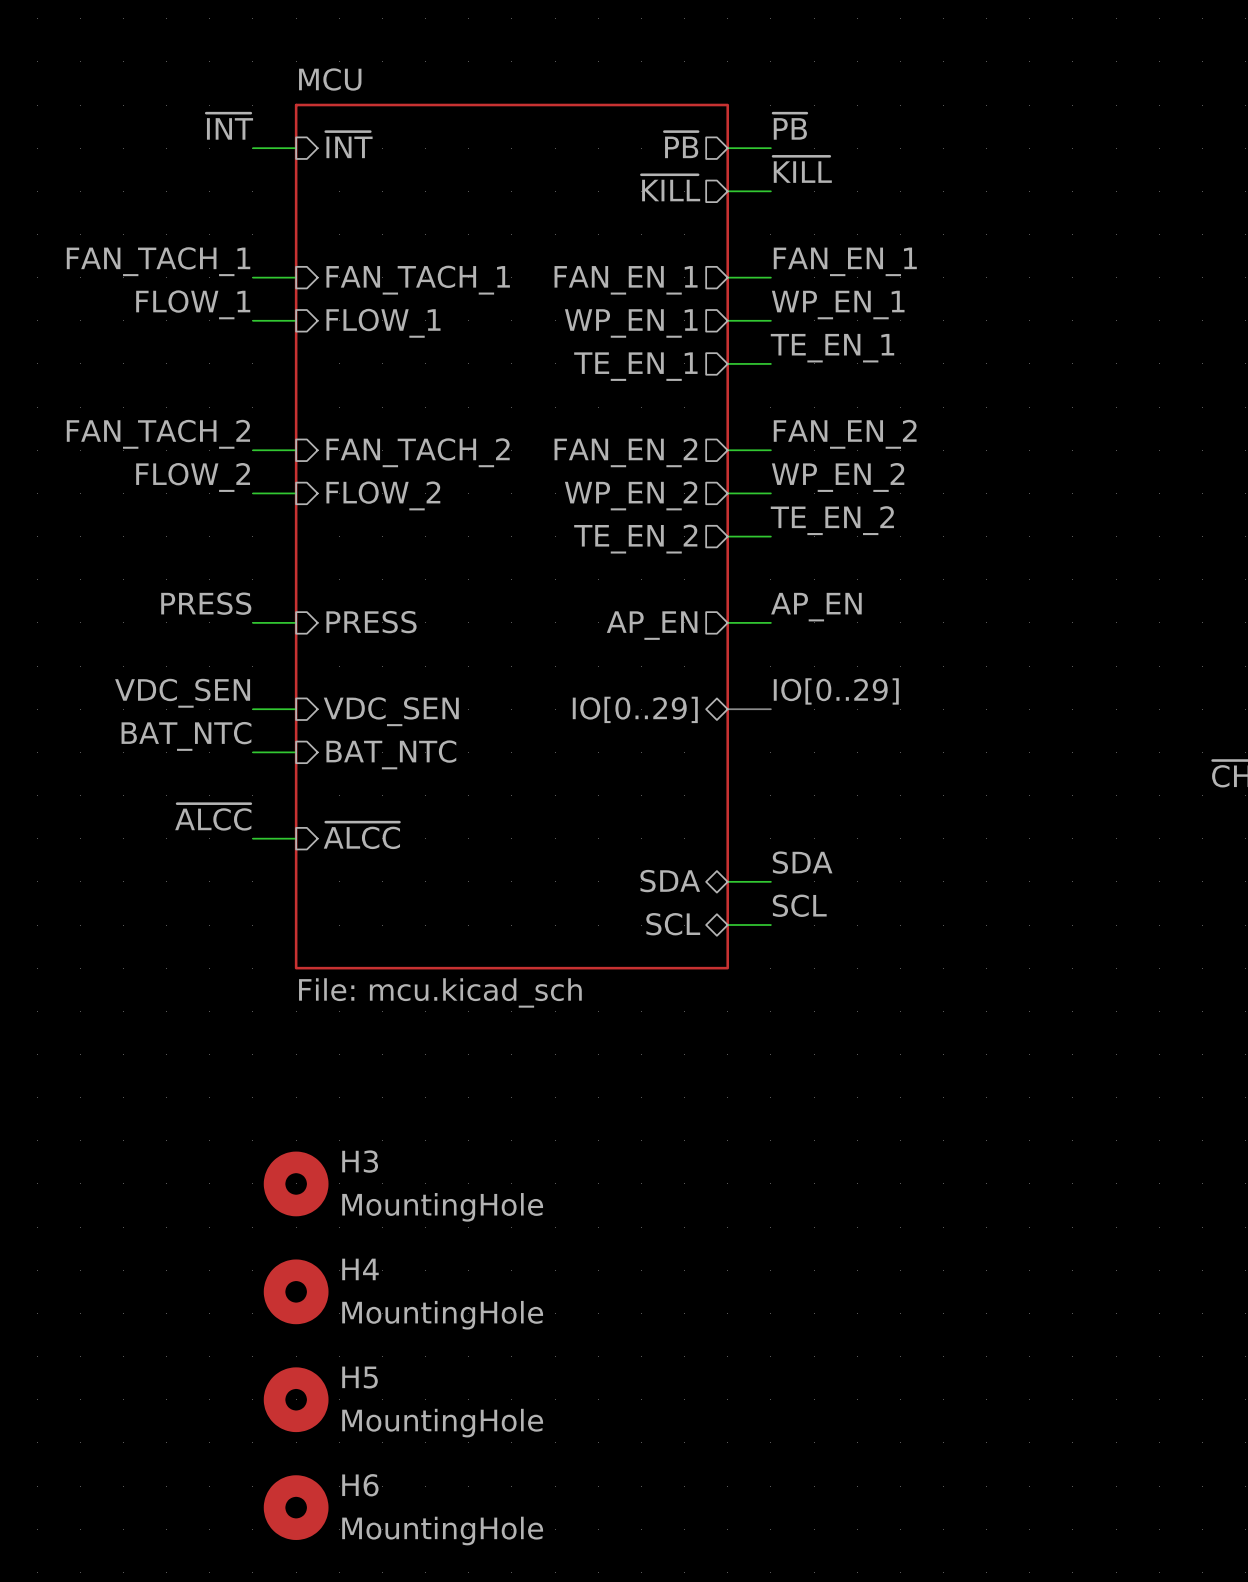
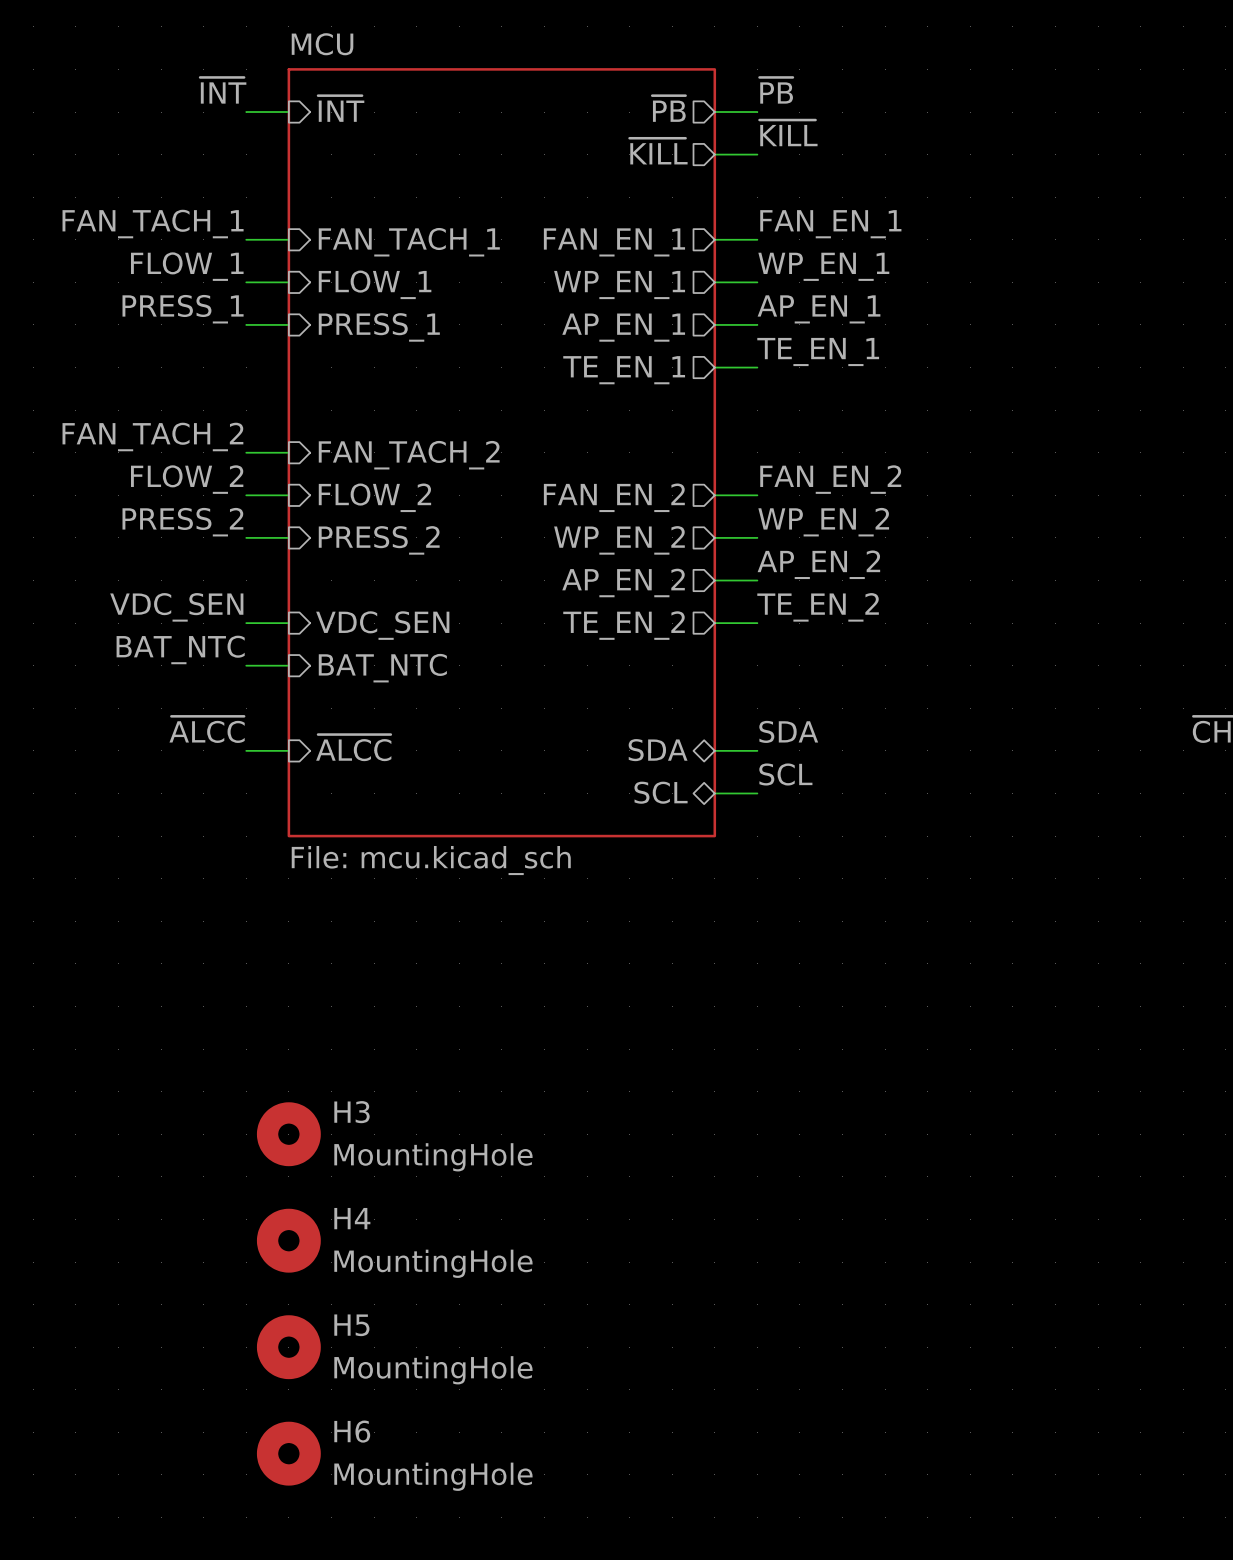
label: none -> PRESS_1 (183, 309)
label: TE_EN_1 (832, 348) -> AP_EN_1 (819, 309)
sheet pin: none -> PRESS_1 (379, 327)
sheet pin: TE_EN_1 (635, 366) -> AP_EN_1 (623, 327)
label: none -> TE_EN_1 (818, 351)
sheet pin: none -> TE_EN_1 (624, 370)
label: FAN_TACH_2 (158, 434) -> none
label: FAN_EN_2 (845, 434) -> none
wire: (252, 450) (296, 450) -> (246, 324) (288, 324)
wire: (727, 450) (770, 450) -> (714, 537) (757, 537)
sheet pin: FAN_TACH_2 (418, 452) -> none
sheet pin: FAN_EN_2 (625, 452) -> none
label: FLOW_2 (193, 477) -> FAN_TACH_2 (152, 436)
label position: WP_EN_2 (838, 477) -> WP_EN_2 (823, 522)
sheet MCU: none -> File: mcu.kicad_sch (501, 452)
wire: (727, 493) (770, 493) -> (714, 367) (757, 367)
sheet pin: FLOW_2 (383, 495) -> FAN_TACH_2 (409, 455)
sheet pin position: WP_EN_2 (631, 495) -> WP_EN_2 (619, 540)
label: none -> FLOW_2 (187, 479)
label: TE_EN_2 (832, 520) -> FAN_EN_2 (830, 479)
sheet MCU: File: mcu.kicad_sch (511, 536) -> none
sheet pin: none -> FLOW_2 (374, 497)
sheet pin: TE_EN_2 (635, 539) -> FAN_EN_2 (614, 497)
wire: none -> (246, 537) (288, 537)
label: PRESS (206, 603) -> PRESS_2 (182, 522)
label: AP_EN (816, 607) -> AP_EN_2 (818, 564)
wire: (252, 622) (296, 622) -> (246, 495) (288, 495)
sheet pin: PRESS (371, 622) -> PRESS_2 (379, 540)
sheet pin: AP_EN (652, 625) -> AP_EN_2 (623, 582)
label: none -> VDC_SEN (176, 607)
label: none -> TE_EN_2 (818, 607)
wire: none -> (714, 623) (757, 623)
sheet pin: none -> VDC_SEN (382, 625)
sheet pin: none -> TE_EN_2 (624, 625)
label: IO[0..29] (836, 691) -> none
label: VDC_SEN (182, 693) -> BAT_NTC (180, 649)
sheet pin: IO[0..29] (635, 709) -> none
bus: (727, 709) (770, 709) -> none
sheet pin: VDC_SEN (391, 711) -> BAT_NTC (382, 668)
label: BAT_NTC (186, 736) -> none
wire: (252, 752) (296, 752) -> (246, 623) (288, 623)
sheet pin: BAT_NTC (391, 754) -> none
label position: ~{ALCC} (213, 817) -> ~{ALCC} (207, 729)
sheet pin position: ~{ALCC} (361, 835) -> ~{ALCC} (353, 747)
wire: (252, 838) (296, 838) -> (246, 750) (288, 750)
label position: SDA (802, 862) -> SDA (788, 731)
sheet pin position: SDA (670, 881) -> SDA (658, 750)
wire: (727, 881) (770, 881) -> (714, 750) (757, 750)
label position: SCL (799, 905) -> SCL (785, 774)
sheet pin position: SCL (673, 924) -> SCL (661, 792)
wire: (727, 925) (770, 925) -> (714, 793) (757, 793)

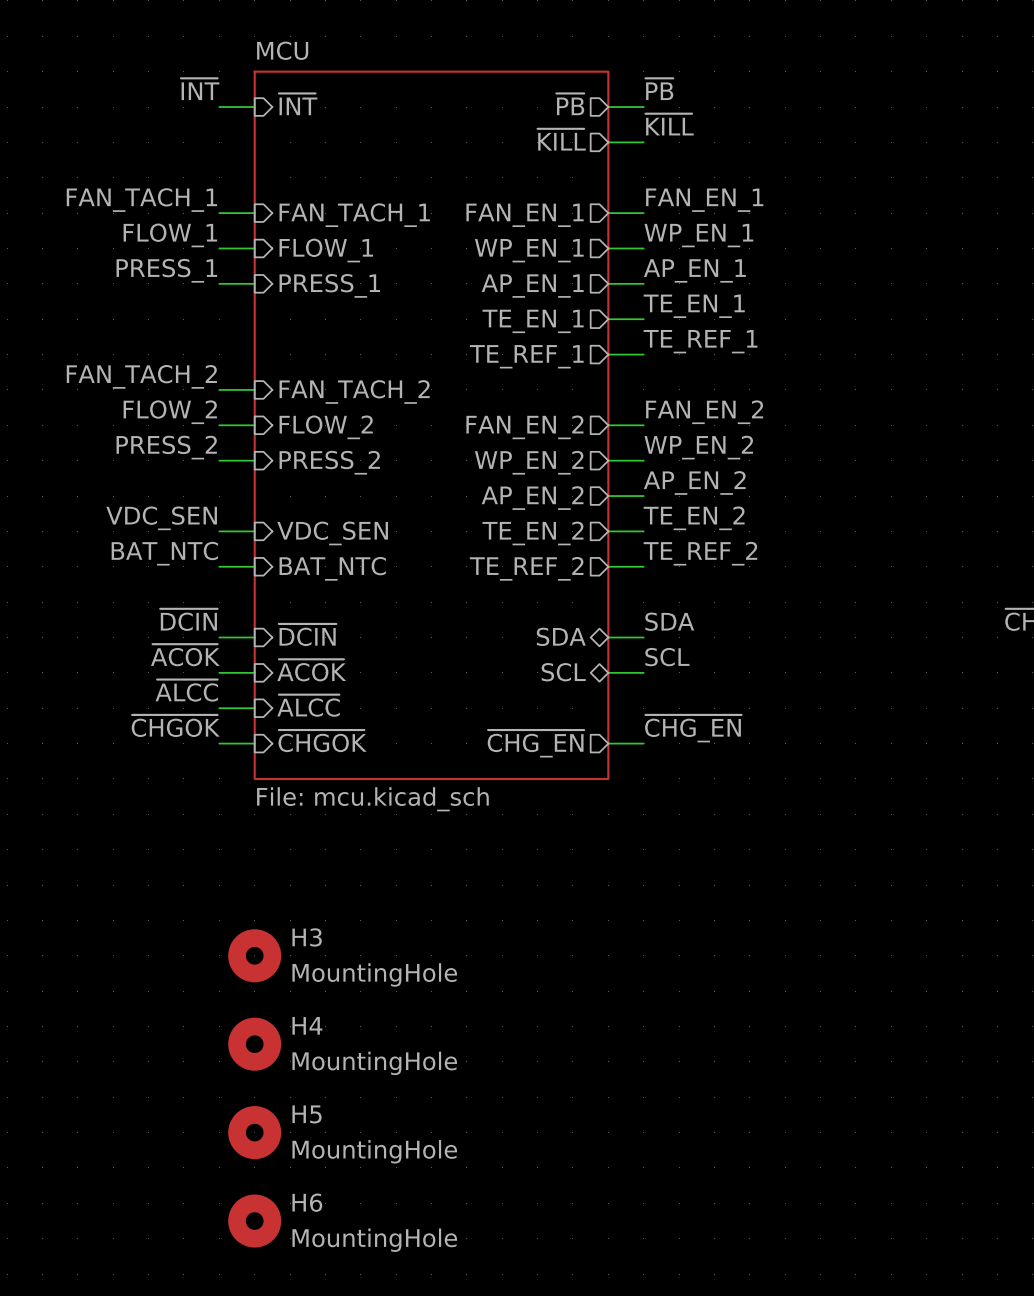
label: none -> TE_REF_1 (700, 341)
wire: none -> (608, 354) (643, 354)
sheet pin: none -> TE_REF_1 (526, 356)
sheet MCU: File: mcu.kicad_sch (501, 452) -> none
sheet MCU: none -> File: mcu.kicad_sch (431, 425)
label: none -> TE_REF_2 (700, 553)
wire: none -> (608, 566) (643, 566)
sheet pin: none -> TE_REF_2 (526, 568)
label: ~{ALCC} (207, 729) -> ~{DCIN} (188, 619)
sheet pin: ~{ALCC} (353, 747) -> ~{DCIN} (307, 634)
label: none -> ~{ACOK} (185, 655)
sheet pin: none -> ~{ACOK} (311, 670)
wire: none -> (219, 672) (254, 672)
label: none -> ~{ALCC} (186, 690)
sheet pin: none -> ~{ALCC} (308, 705)
wire: none -> (219, 708) (254, 708)
label: none -> ~{CHGOK} (175, 725)
label: none -> ~{CHG_EN} (693, 728)
sheet pin: none -> ~{CHGOK} (322, 741)
wire: none -> (219, 743) (254, 743)
sheet pin: none -> ~{CHG_EN} (535, 743)
wire: none -> (608, 743) (643, 743)

